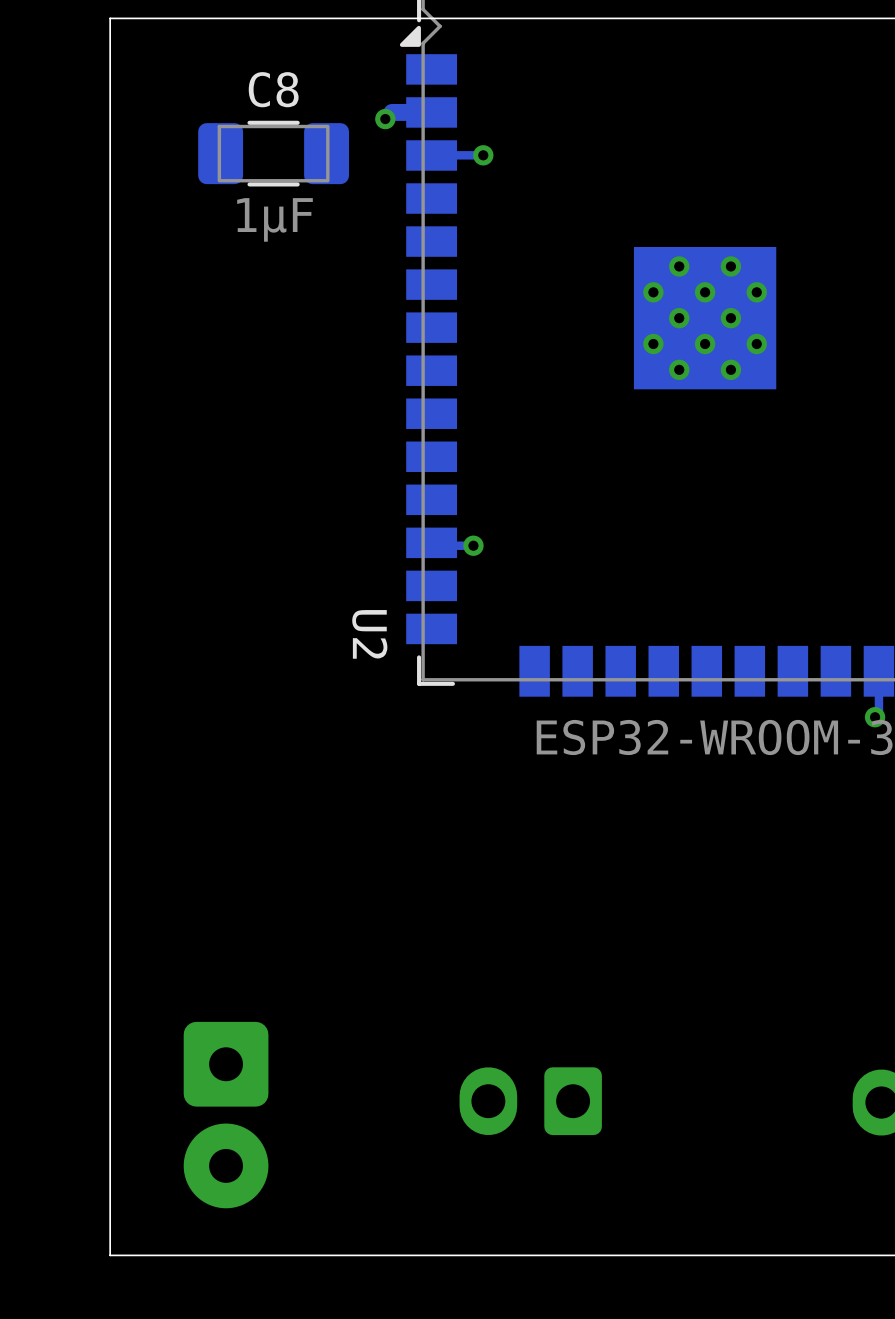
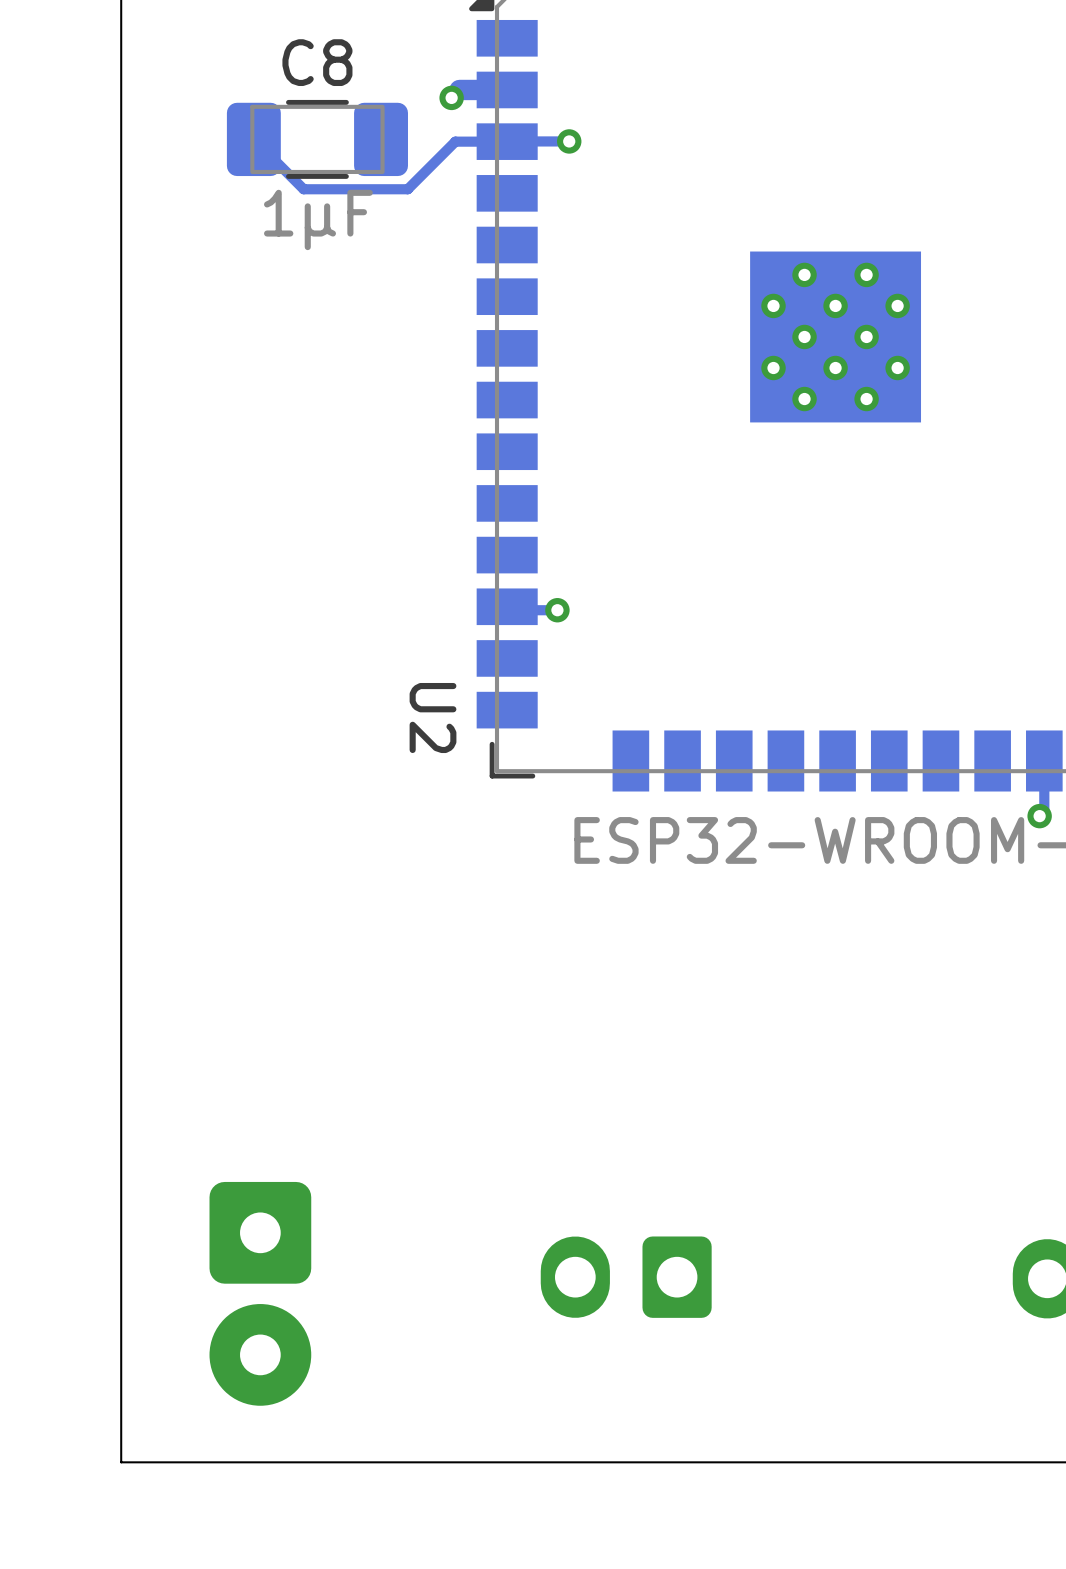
track: none -> (253, 139) (303, 189) (407, 189) (455, 141) (507, 141)

